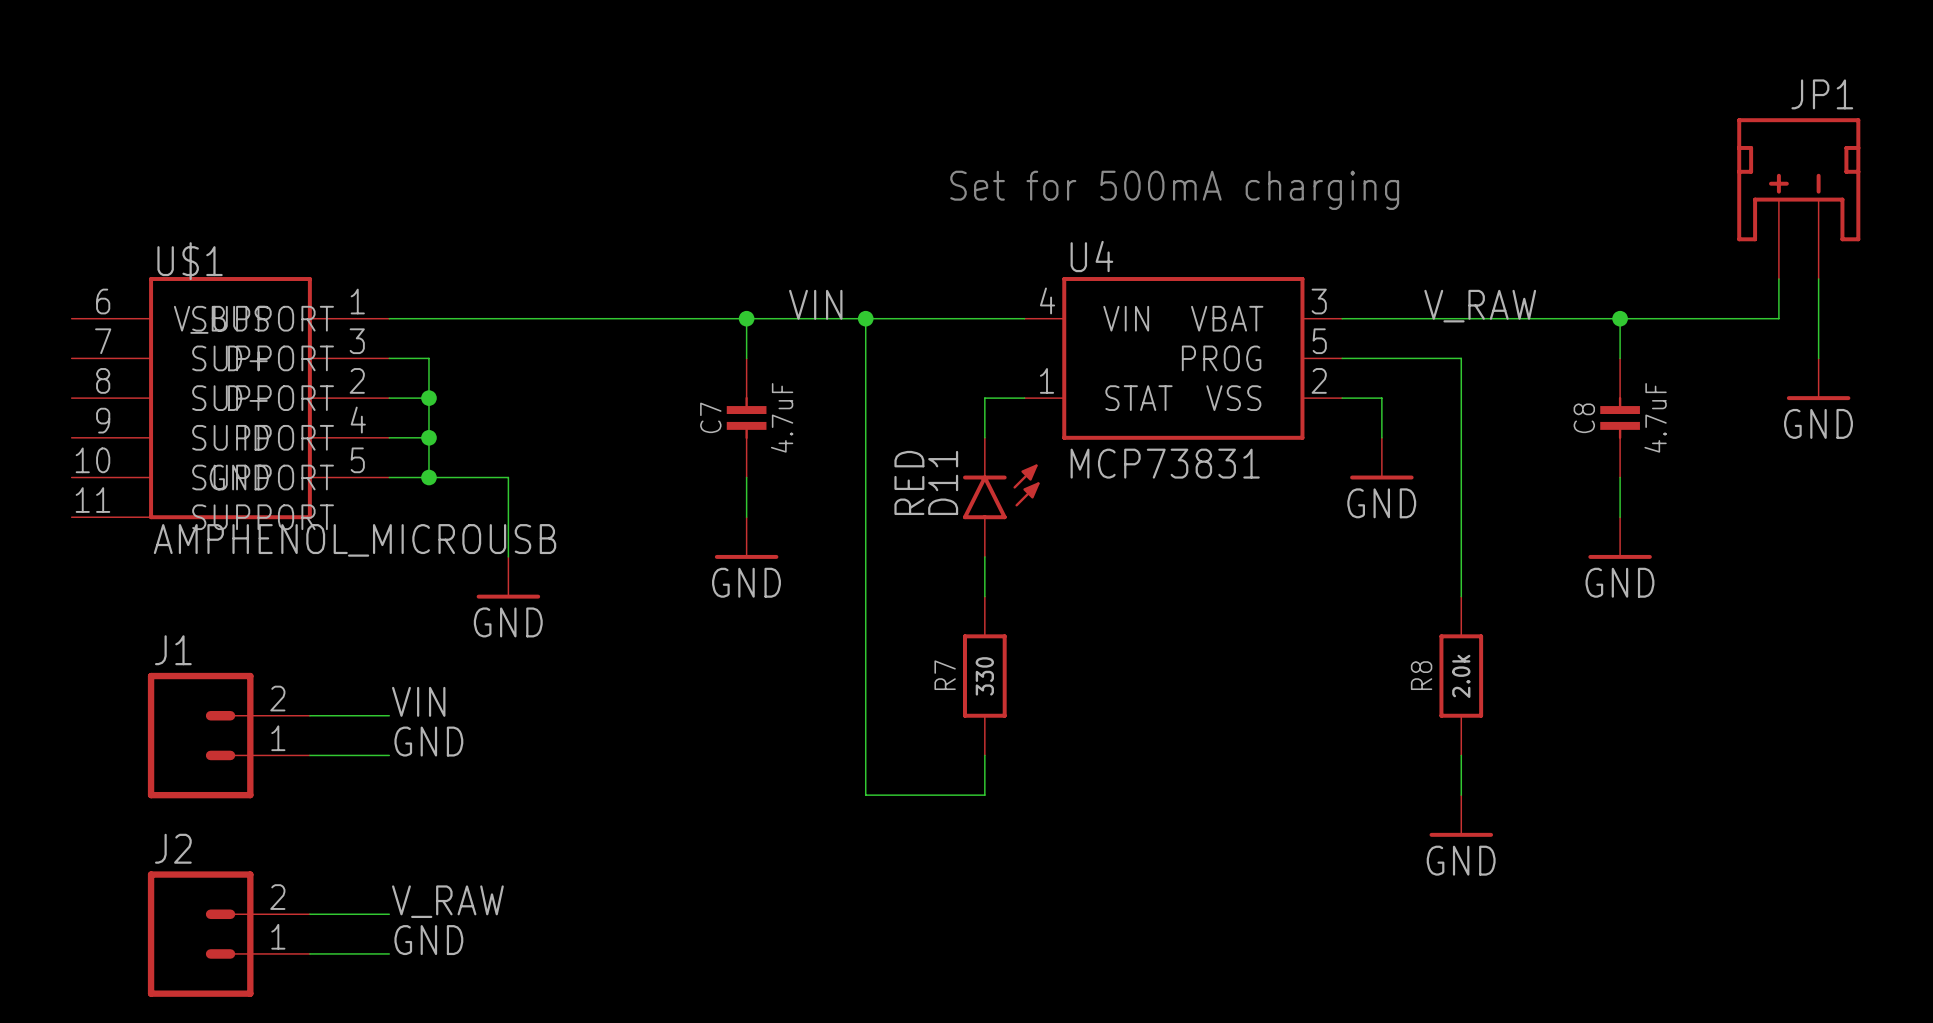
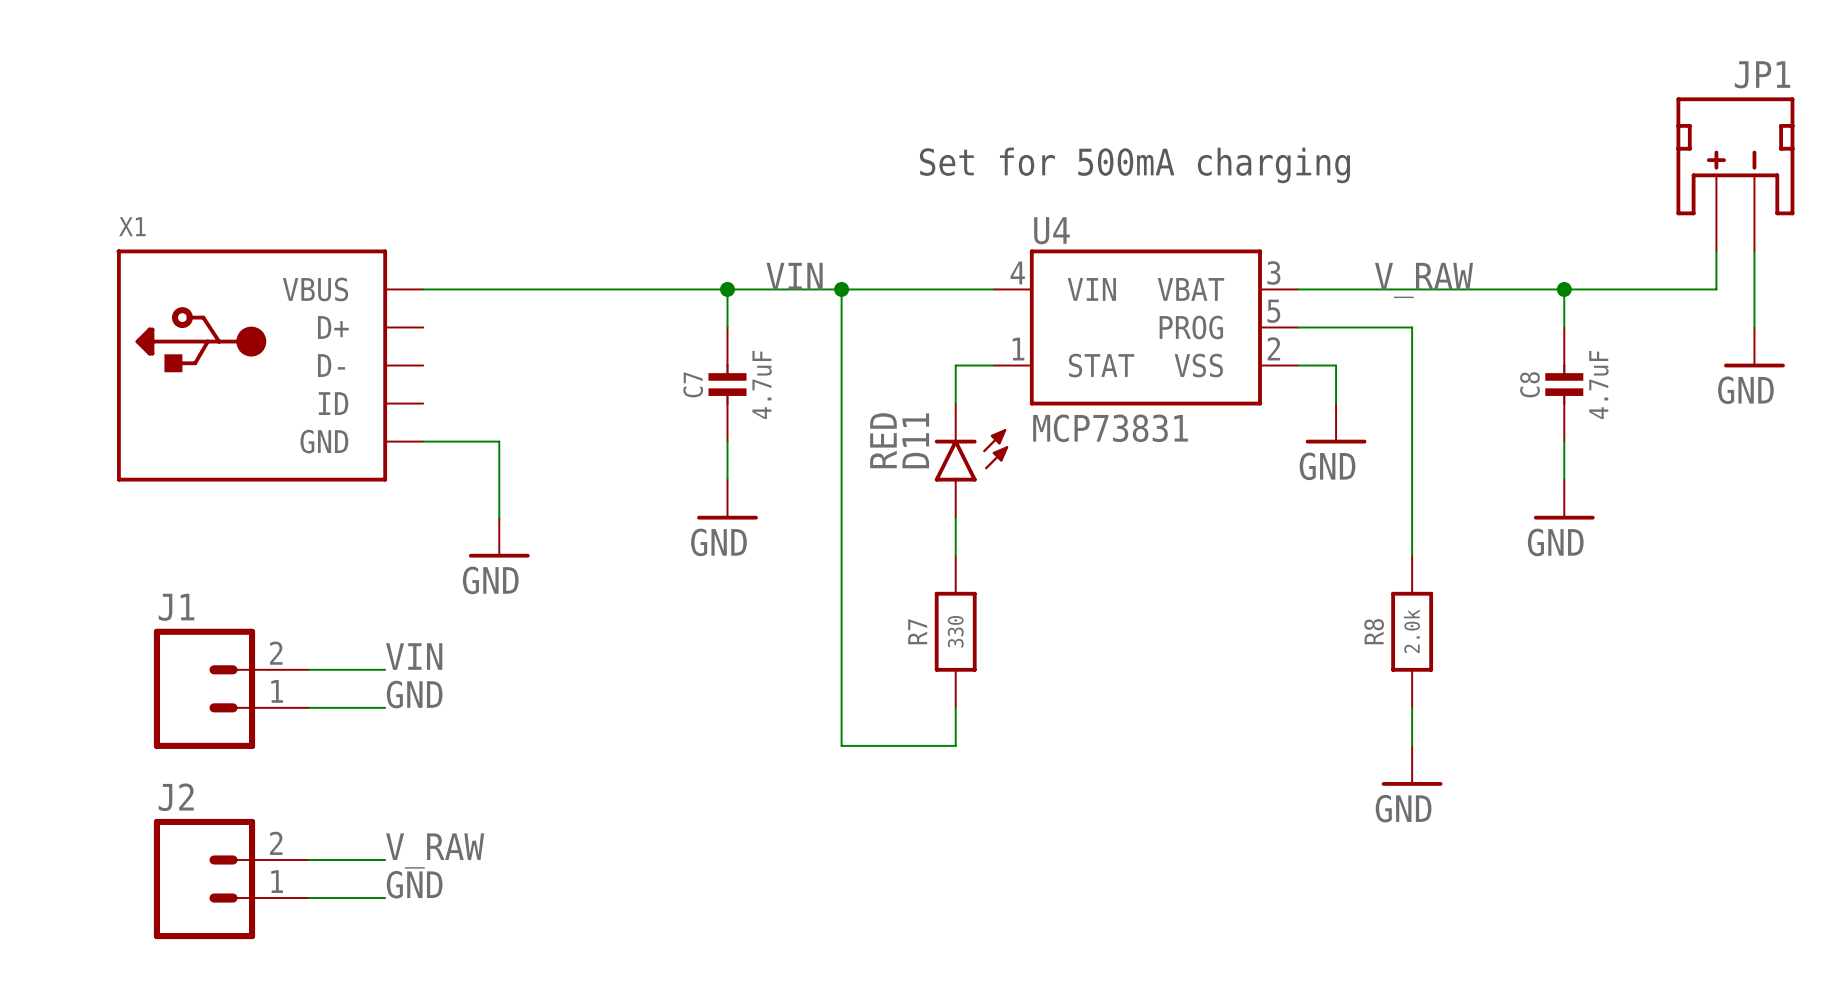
wire: (389, 358) (428, 358) (428, 477) (389, 477) -> none
U$1: AMPHENOL_MICROUSB (230, 398) -> none
X1: none -> (269, 365)
junction: (428, 398) -> none
junction: (428, 437) -> none
junction: (428, 477) -> none

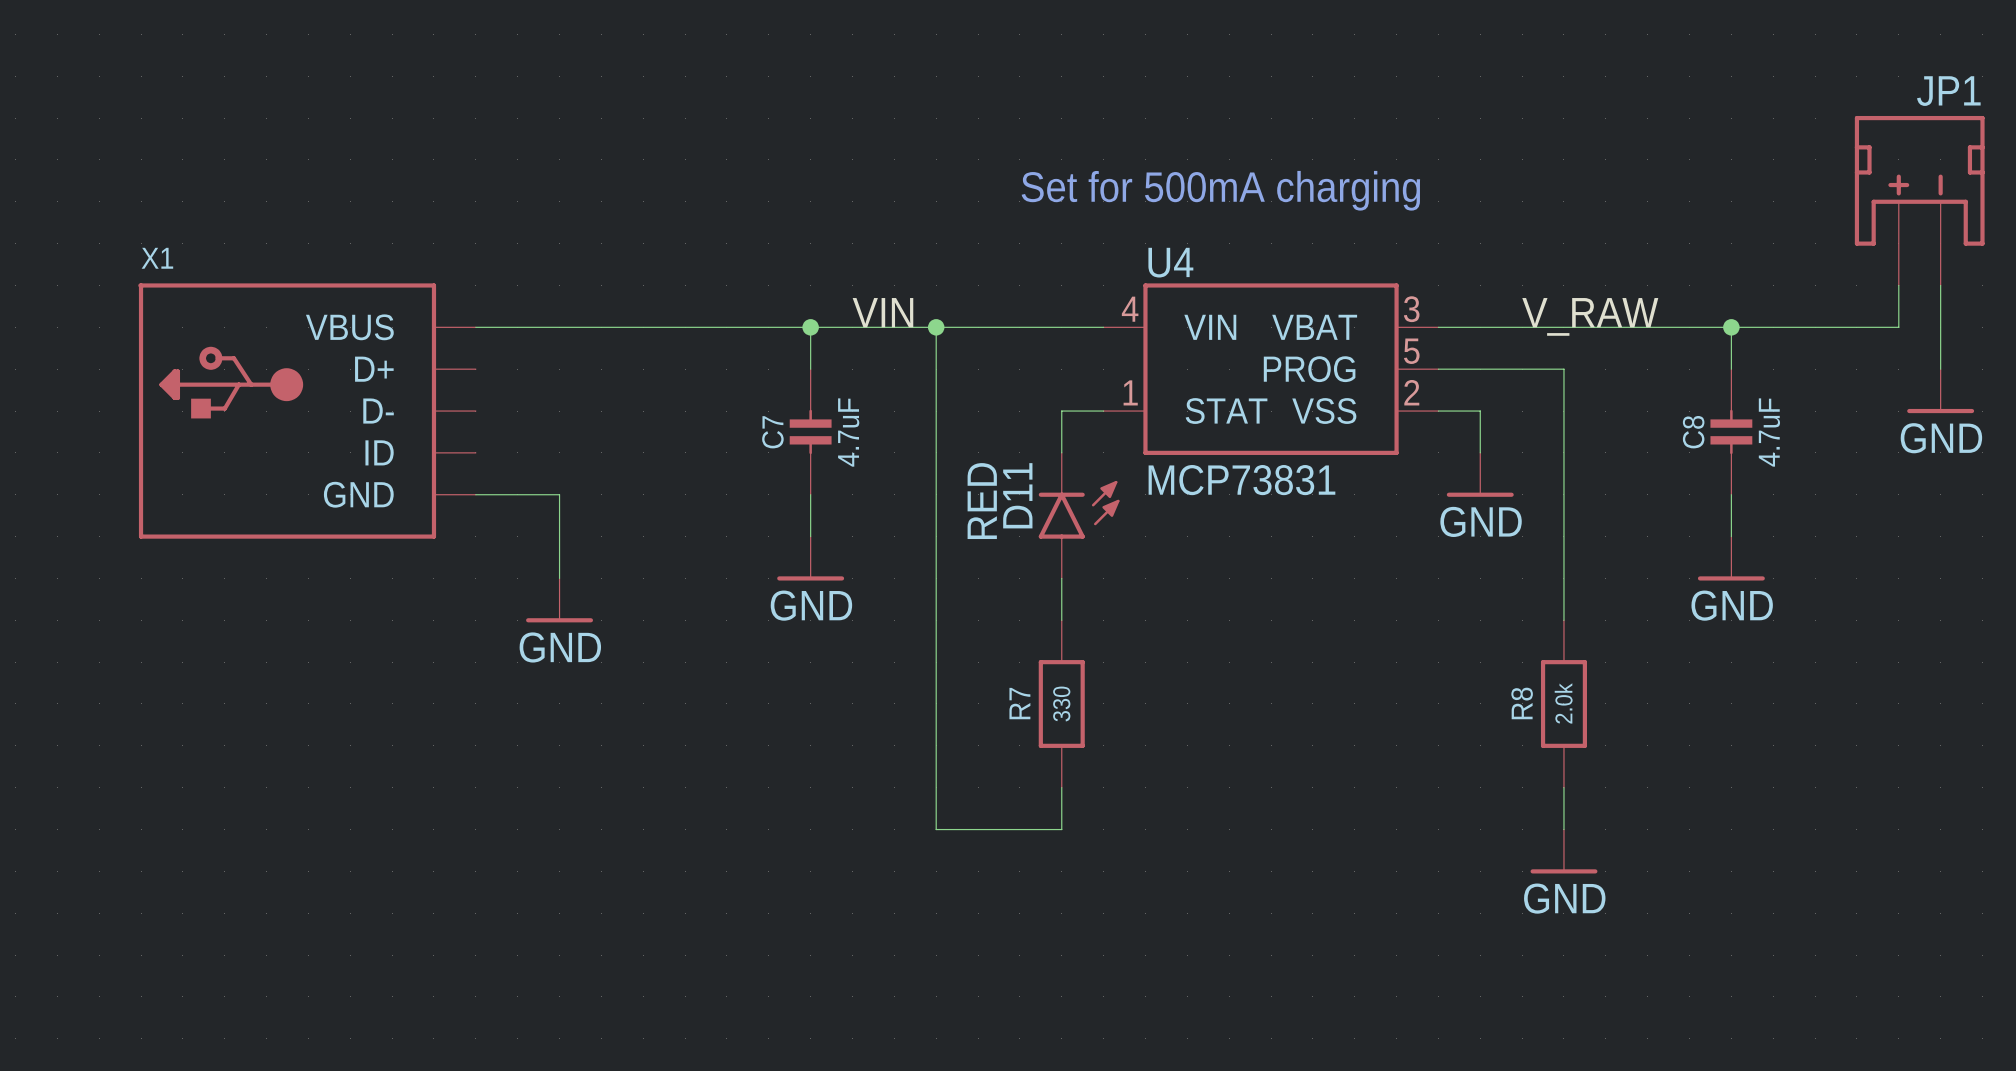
label: VIN (414, 656) -> none
wire: (309, 669) (385, 669) -> none
J1: (231, 688) -> none
label: GND (414, 694) -> none
wire: (309, 707) (385, 707) -> none
label: V_RAW (435, 850) -> none
wire: (309, 859) (385, 859) -> none
J2: (231, 879) -> none
label: GND (414, 884) -> none
wire: (309, 898) (385, 898) -> none

